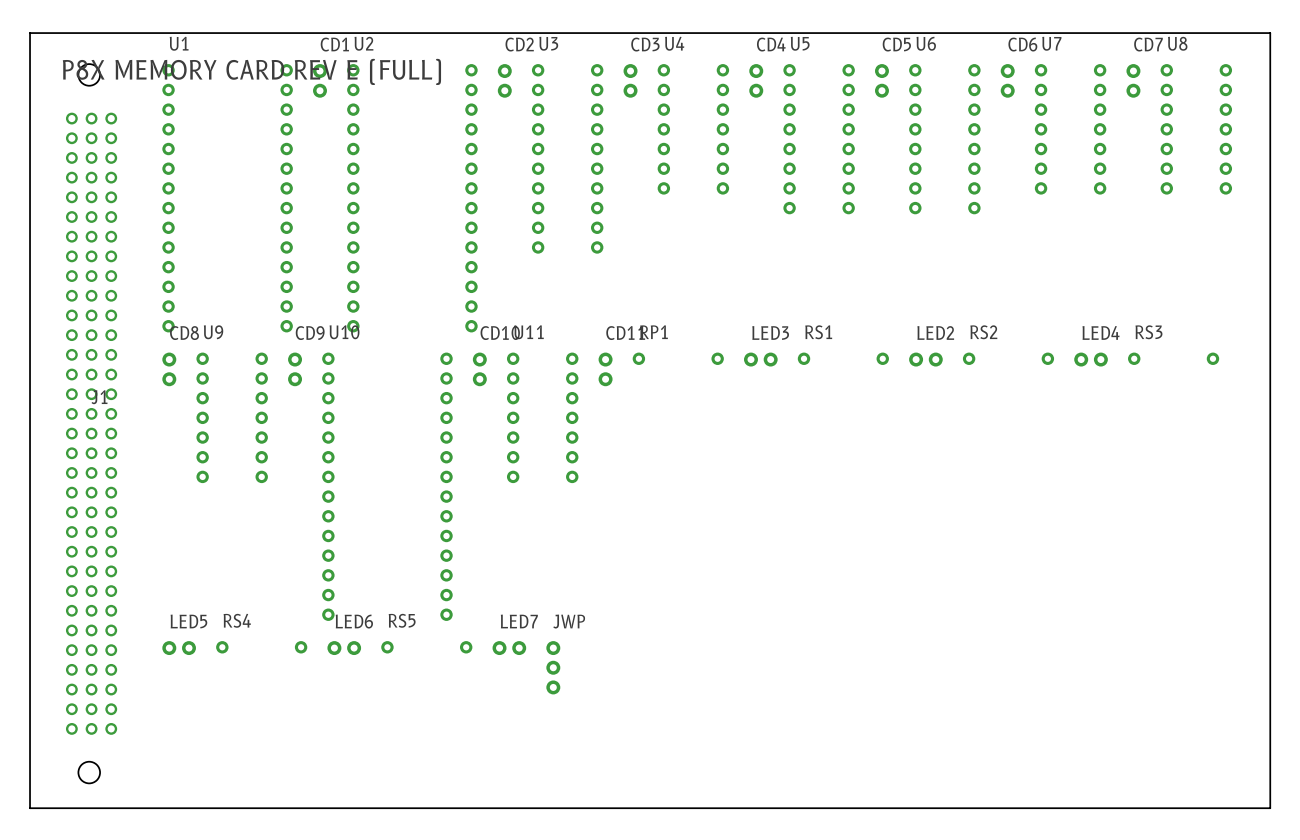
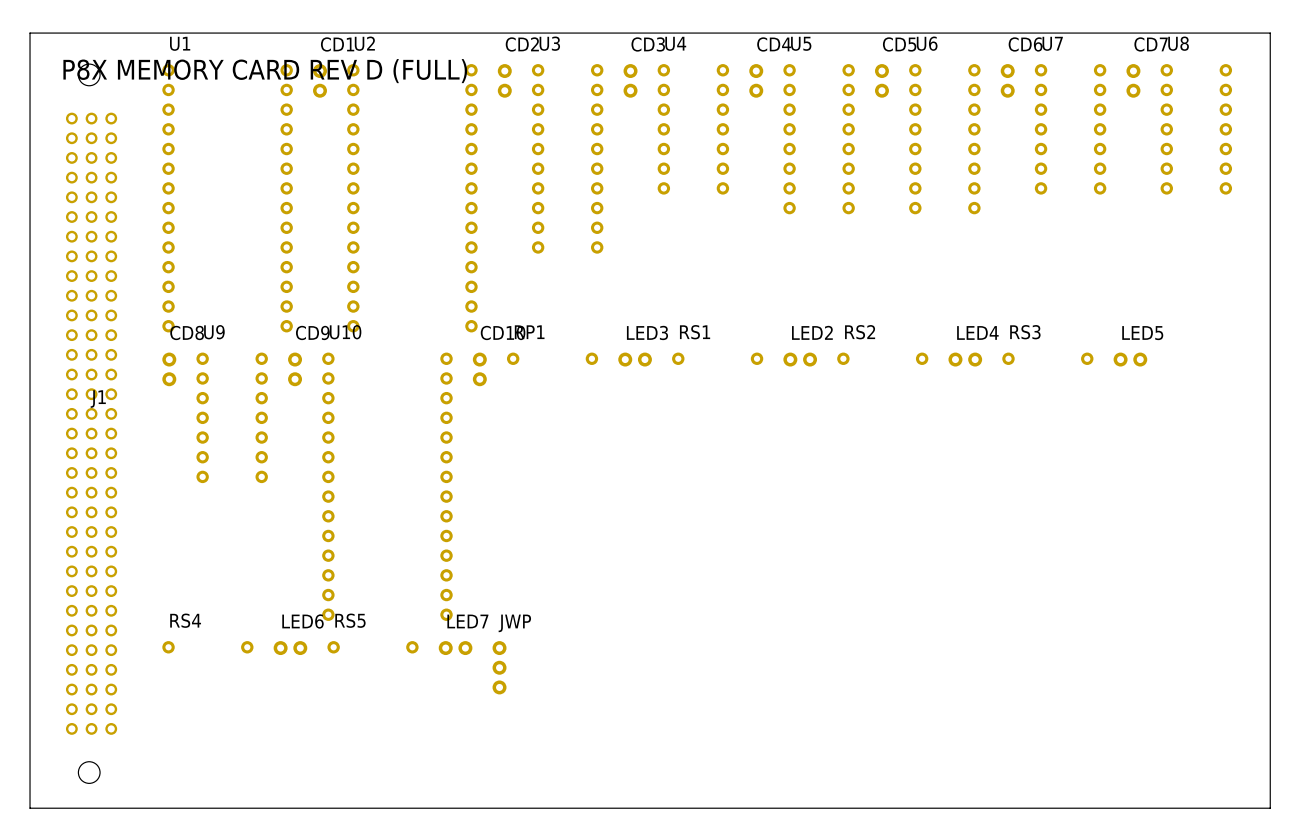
text: P8X MEMORY CARD REV E (FULL) (251, 71) -> P8X MEMORY CARD REV D (FULL) (265, 71)
RP1 position: (678, 358) -> (552, 358)
RS1 position: (843, 358) -> (717, 358)
RS2 position: (1008, 358) -> (882, 358)
RS3 position: (1173, 358) -> (1047, 358)
LED3 position: (760, 359) -> (635, 359)
LED2 position: (925, 359) -> (800, 359)
LED4 position: (1091, 359) -> (965, 359)
CD11: (605, 369) -> none
U11: (542, 417) -> none
RS4 position: (261, 647) -> (207, 647)
RS5 position: (426, 647) -> (373, 647)
LED5 position: (179, 648) -> (1130, 359)
LED6 position: (344, 648) -> (290, 648)
LED7 position: (509, 648) -> (455, 648)
JWP position: (553, 667) -> (499, 667)

